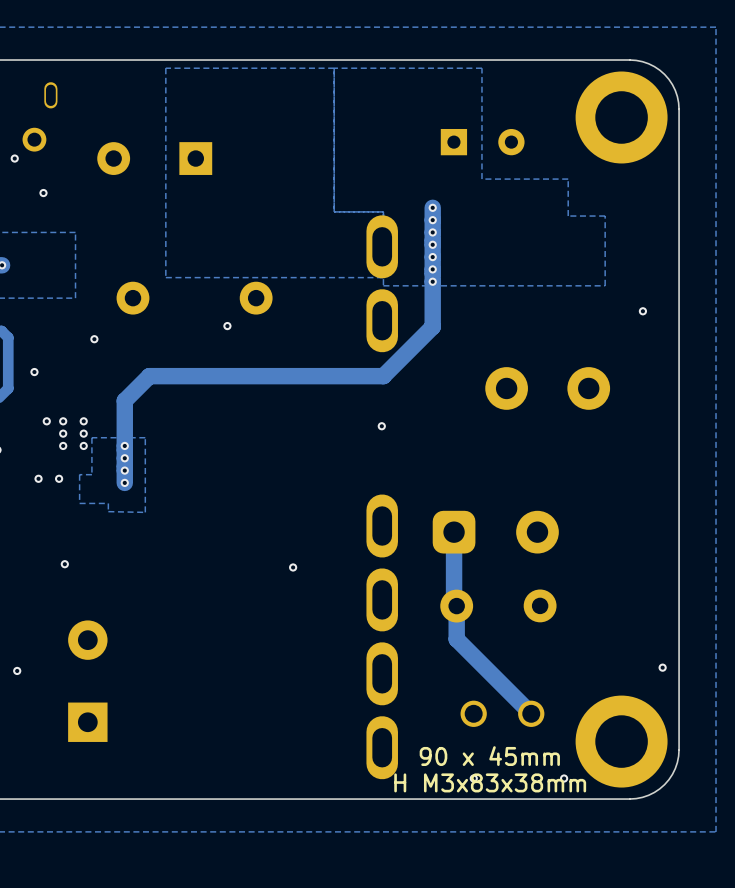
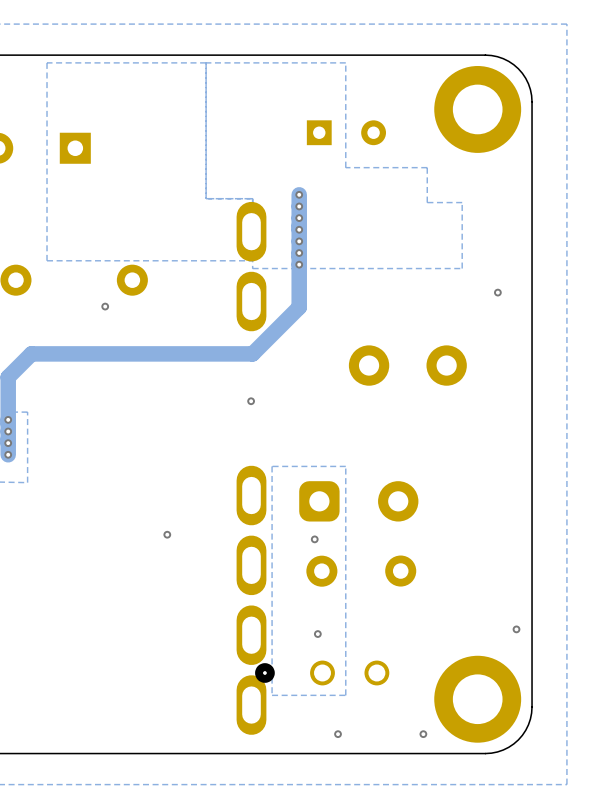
zone outline: none -> (345, 466) (345, 695) (272, 695) (272, 466) (345, 466)
track: (454, 532) (454, 603) (456, 606) (456, 639) (531, 713) -> none
via: none -> (314, 539)
via: none -> (317, 634)
part: none -> (322, 672)
part: (502, 713) -> none
text: 90 x 45mm (489, 756) -> none
text: H M3x83x38mm (490, 782) -> none

